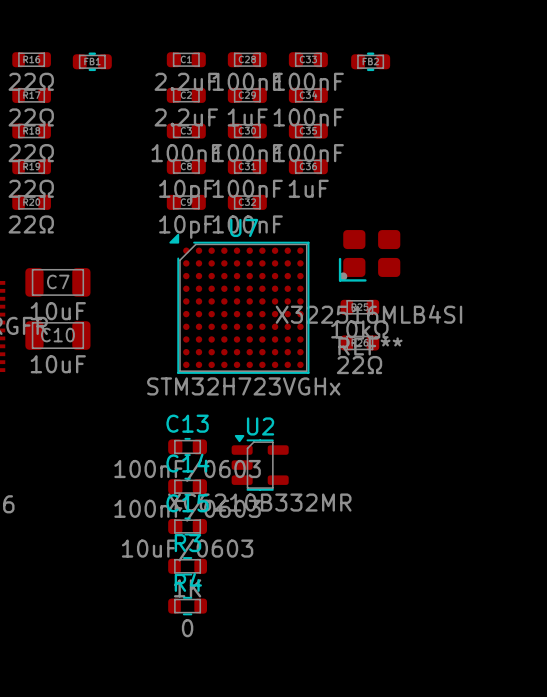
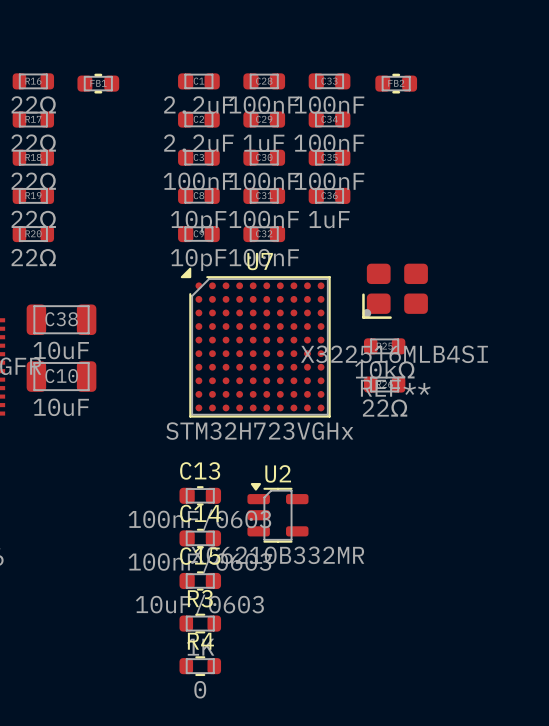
C7 name: C7 (58, 281) -> C38 (61, 319)

